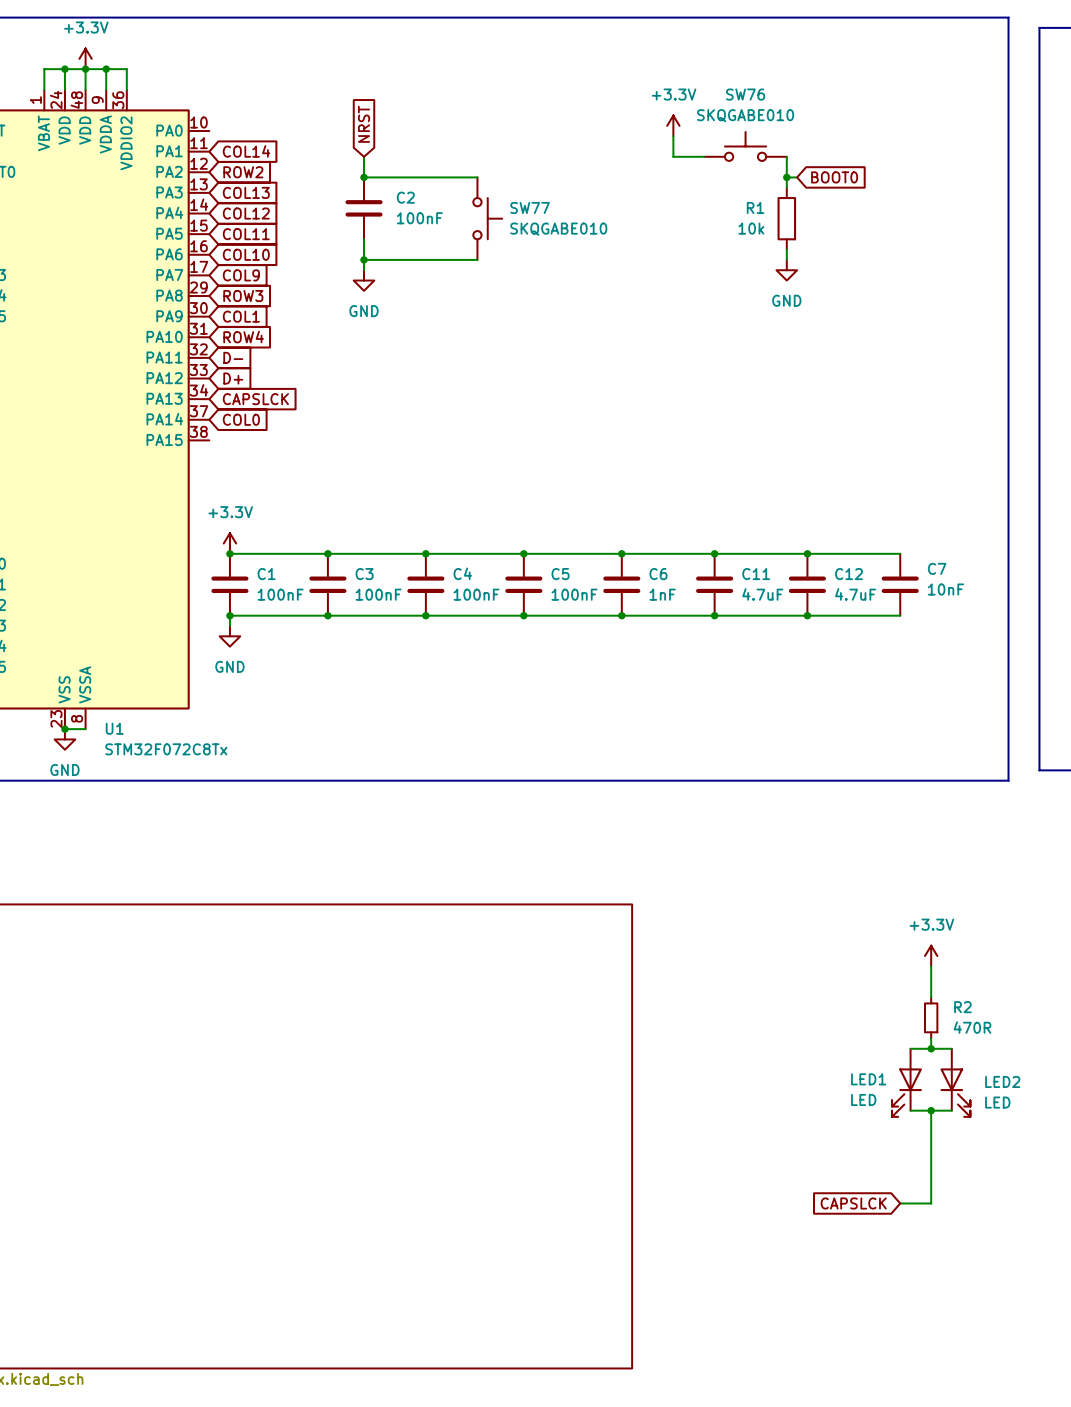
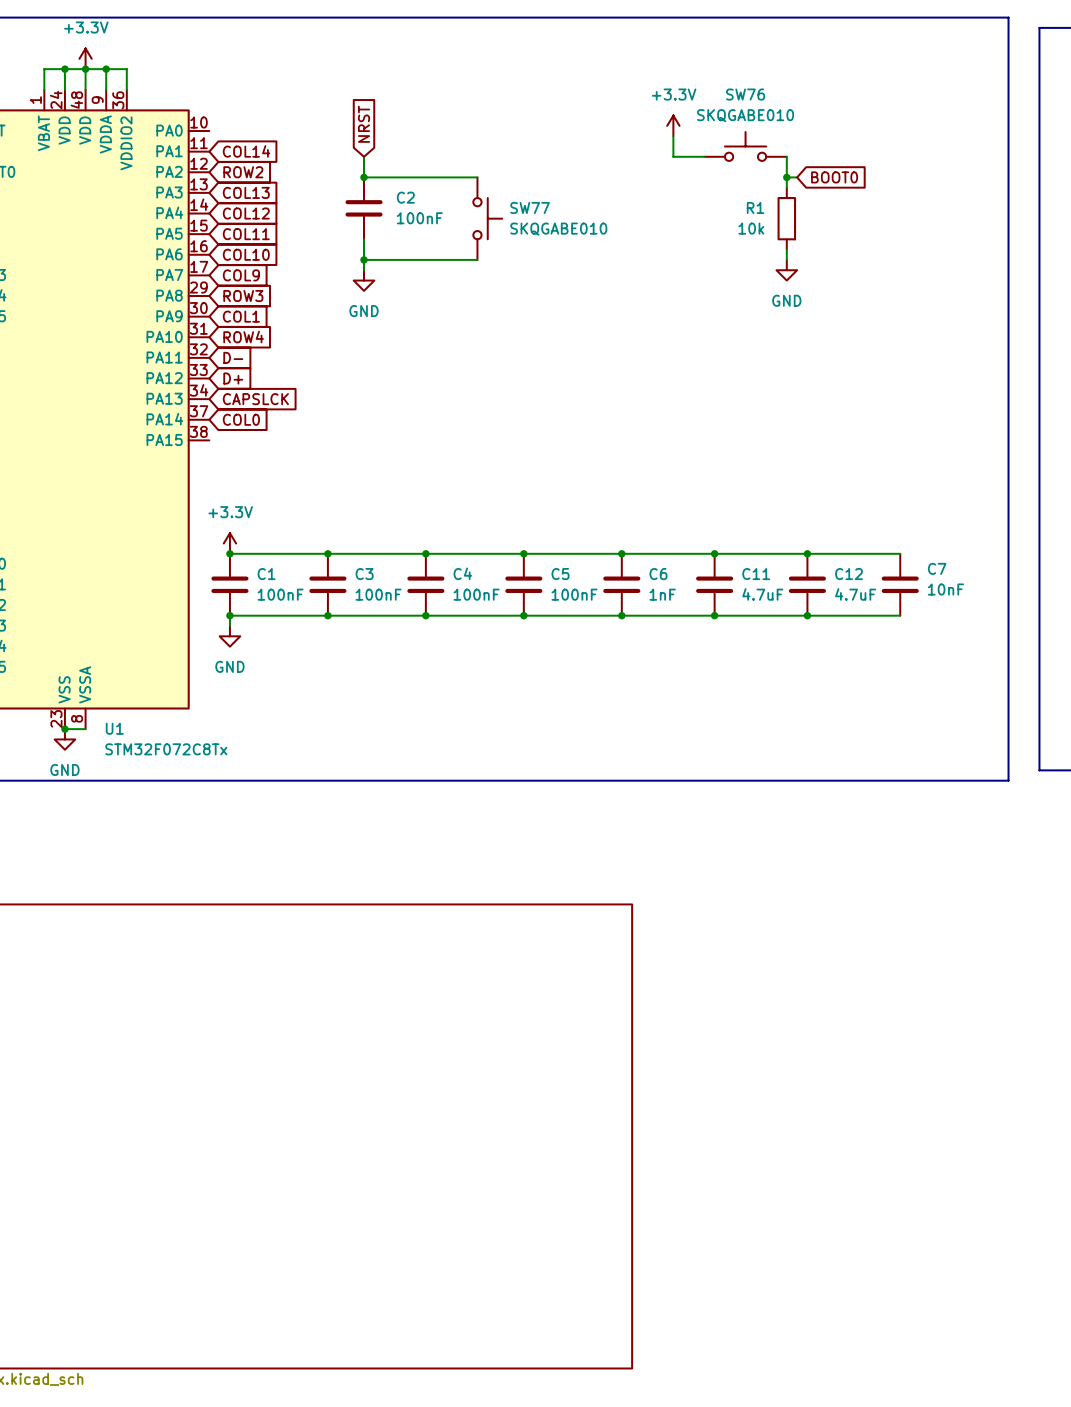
power symbol: +3.3V (931, 955) -> none
wire: (931, 966) (931, 997) -> none
R2: 470R (931, 1017) -> none
wire: (931, 1038) (931, 1048) -> none
wire: (910, 1048) (951, 1048) -> none
junction: (931, 1048) -> none
LED1: LED (906, 1082) -> none
LED2: LED (955, 1082) -> none
wire: (910, 1110) (951, 1110) -> none
wire: (931, 1110) (931, 1203) (900, 1203) -> none
junction: (931, 1110) -> none
global label: CAPSLCK (853, 1203) -> none

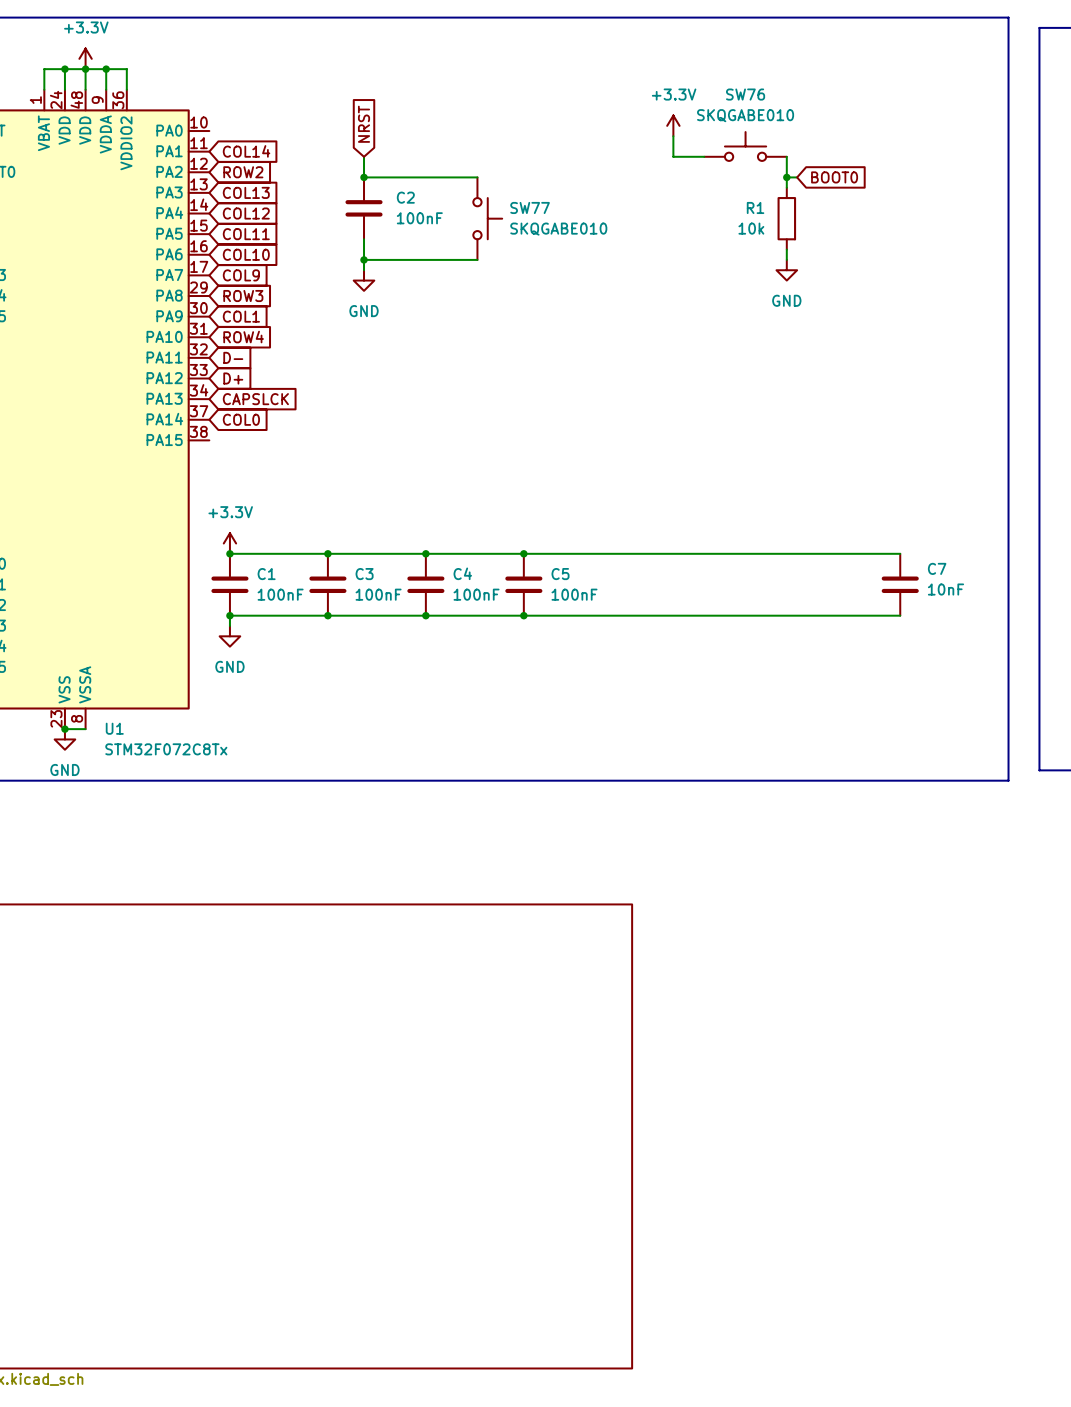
junction: (621, 553) -> none
junction: (714, 553) -> none
junction: (807, 553) -> none
C6: 1nF (621, 584) -> none
C11: 4.7uF (714, 584) -> none
C12: 4.7uF (807, 584) -> none
junction: (621, 615) -> none
junction: (714, 615) -> none
junction: (807, 615) -> none

